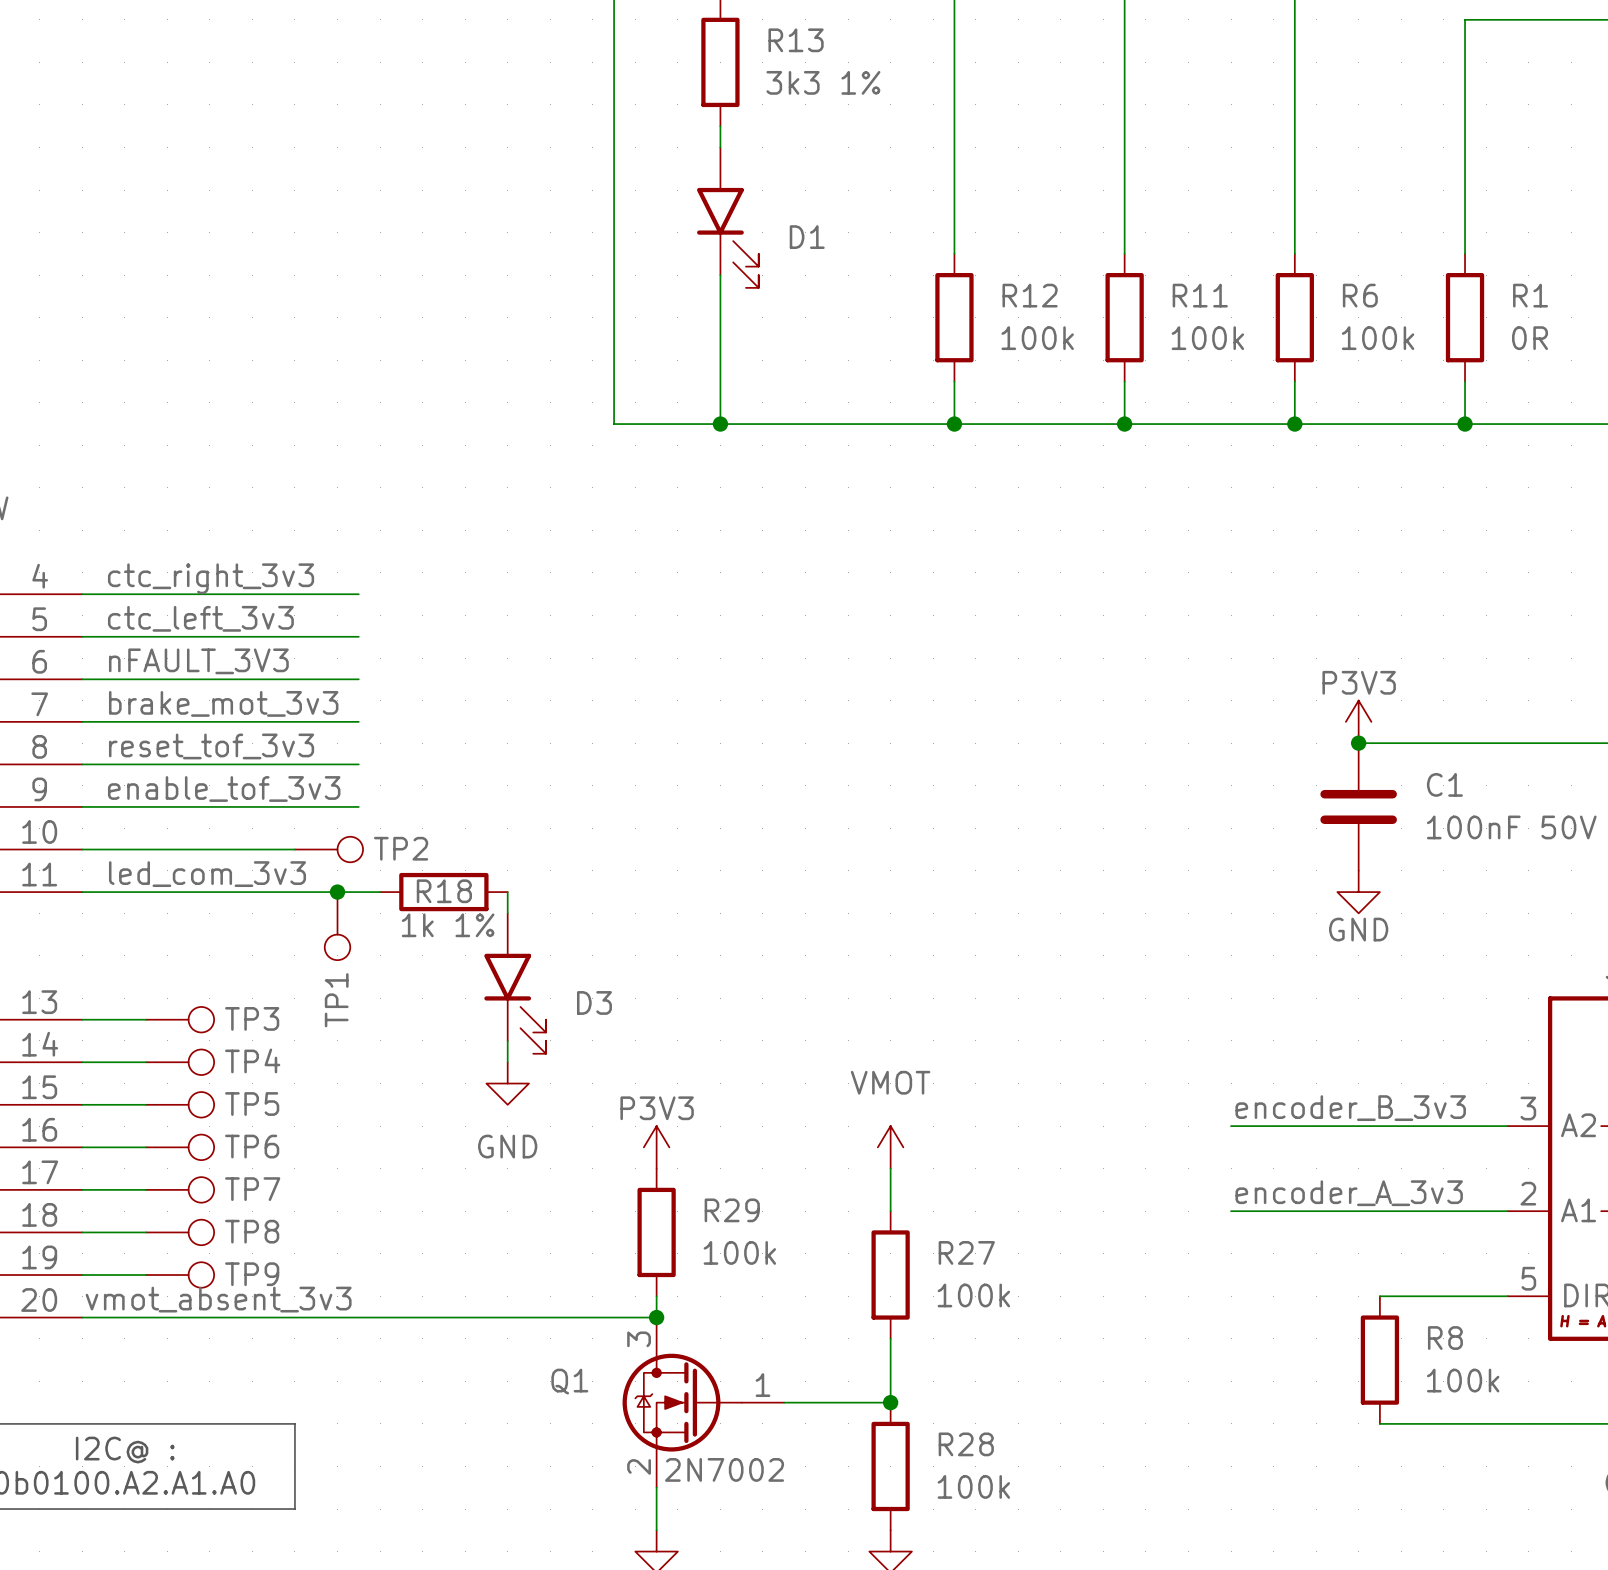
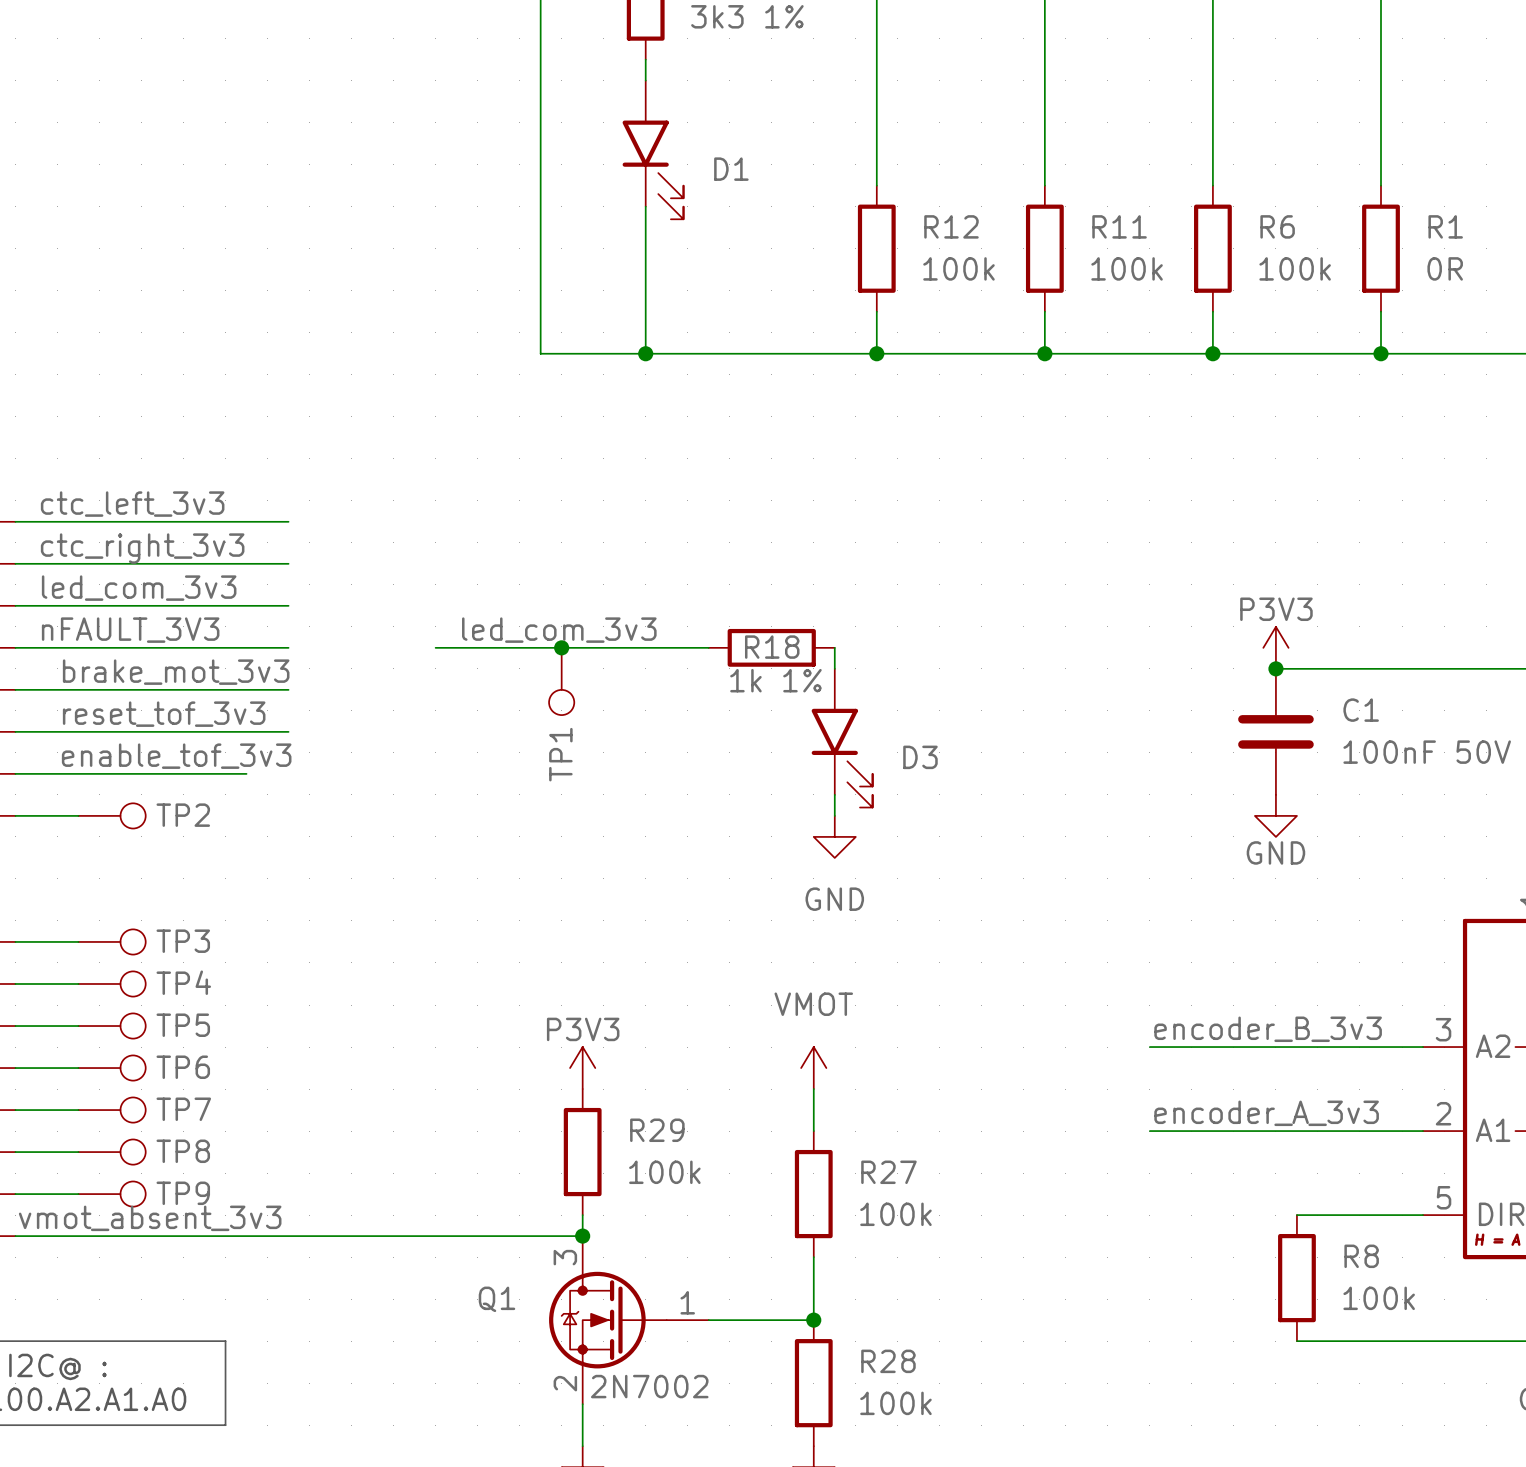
label: ctc_right_3v3 (211, 578) -> ctc_left_3v3 (132, 504)
label: ctc_left_3v3 (200, 618) -> ctc_right_3v3 (142, 548)
label: nFAULT_3V3 (198, 661) -> led_com_3v3 (139, 588)
label: brake_mot_3v3 (223, 703) -> nFAULT_3V3 (130, 630)
label: none -> led_com_3v3 (559, 630)
wire: none -> (435, 647) (708, 647)
junction: none -> (561, 647)
wire: none -> (834, 647) (834, 668)
label position: reset_tof_3v3 (211, 746) -> reset_tof_3v3 (164, 714)
label: none -> brake_mot_3v3 (176, 672)
label position: enable_tof_3v3 (224, 789) -> enable_tof_3v3 (176, 756)
TP2 position: (328, 849) -> (112, 815)
label: led_com_3v3 (207, 874) -> none
wire: (146, 892) (380, 892) -> none
junction: (337, 892) -> none
R18 position: (443, 892) -> (771, 647)
wire: (507, 892) (507, 913) -> (834, 794) (834, 815)
power symbol: none -> GND (834, 836)
TP1 position: (337, 926) -> (561, 681)
D3 position: (515, 983) -> (842, 738)
wire: (507, 1040) (507, 1062) -> none
power symbol: GND (507, 1083) -> none

